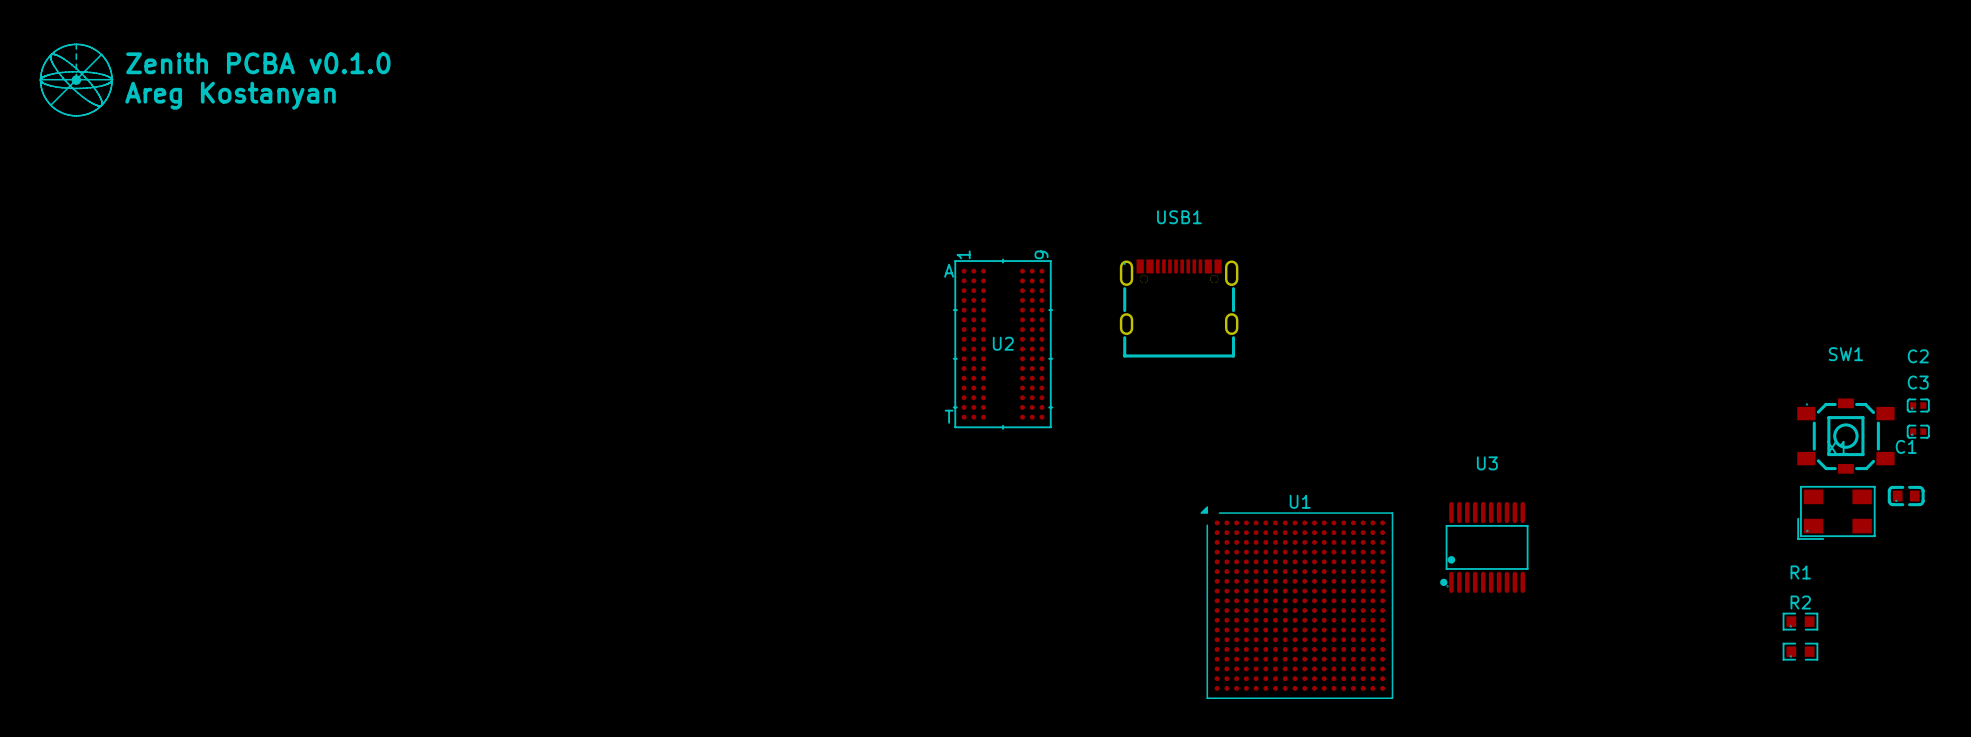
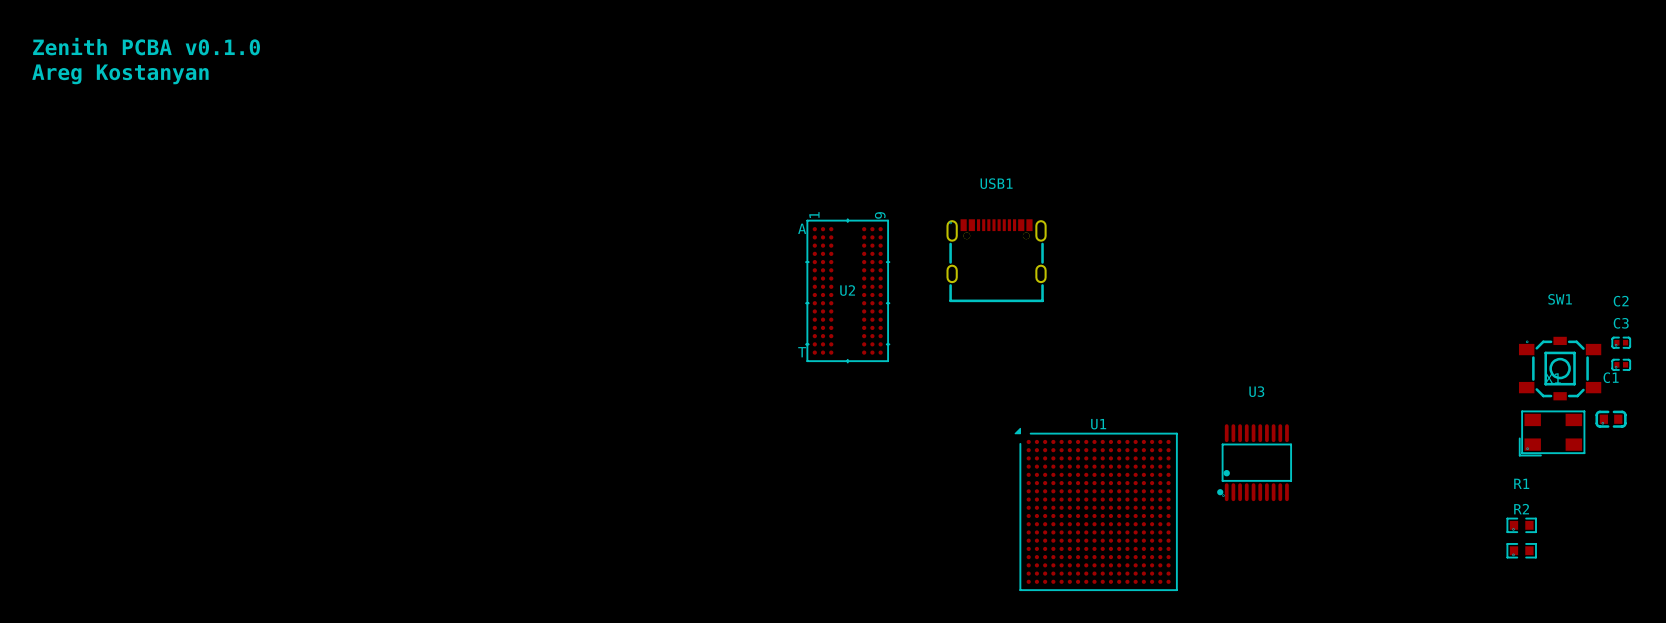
line: (76, 43) (76, 80) -> none
line: (74, 44) (60, 47) (49, 56) (42, 67) (40, 81) (44, 95) (52, 106) (64, 113) (78, 115) (91, 112) (102, 104) (109, 92) (112, 78) (108, 64) (100, 53) (88, 46) (74, 44) -> none
line: (52, 54) (64, 59) (82, 74) (97, 91) (102, 103) -> none
line: (101, 54) (50, 105) -> none
line: (50, 56) (55, 68) (70, 85) (88, 100) (100, 105) -> none
text position: Zenith PCBA v0.1.0 (258, 63) -> Zenith PCBA v0.1.0 (146, 46)
drawing: [71, 75, 82, 85] -> none
line: (41, 78) (53, 73) (76, 71) (99, 73) (111, 78) -> none
line: (40, 79) (112, 79) -> none
line: (41, 81) (53, 86) (76, 88) (99, 86) (111, 81) -> none
text position: Areg Kostanyan (230, 95) -> Areg Kostanyan (120, 74)

